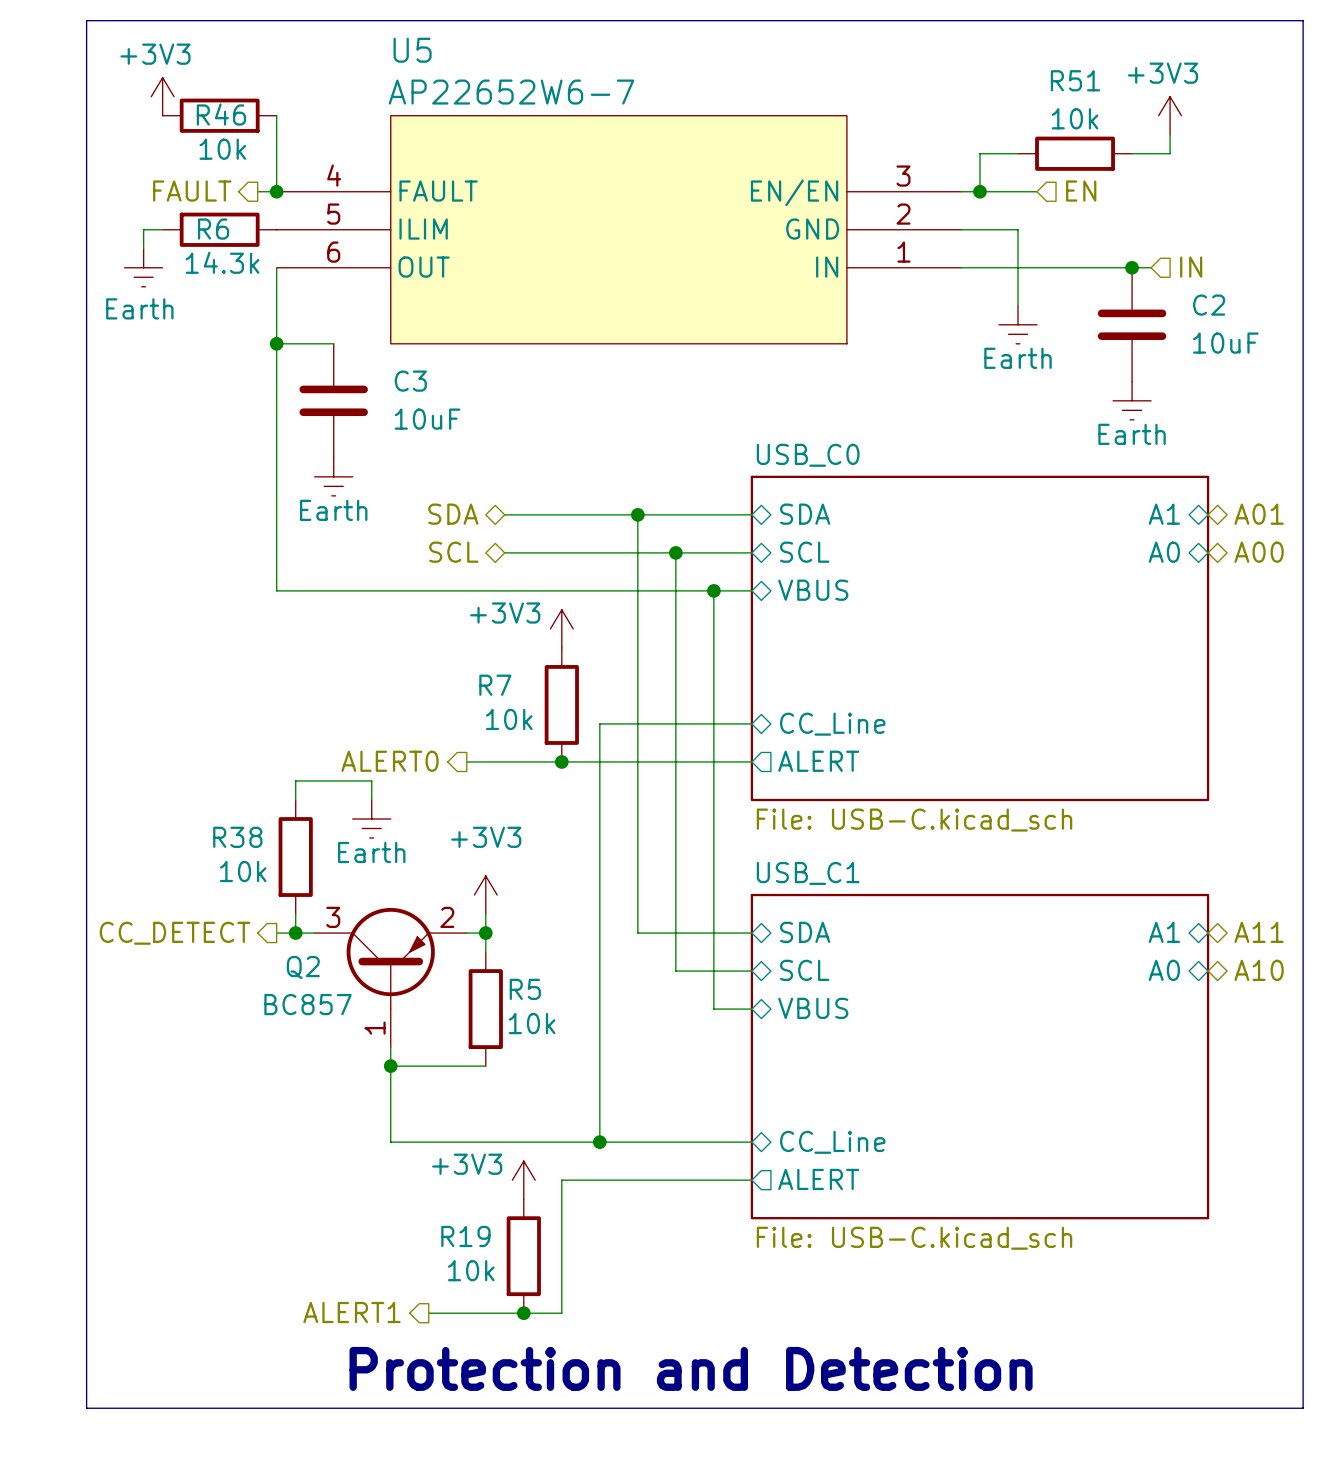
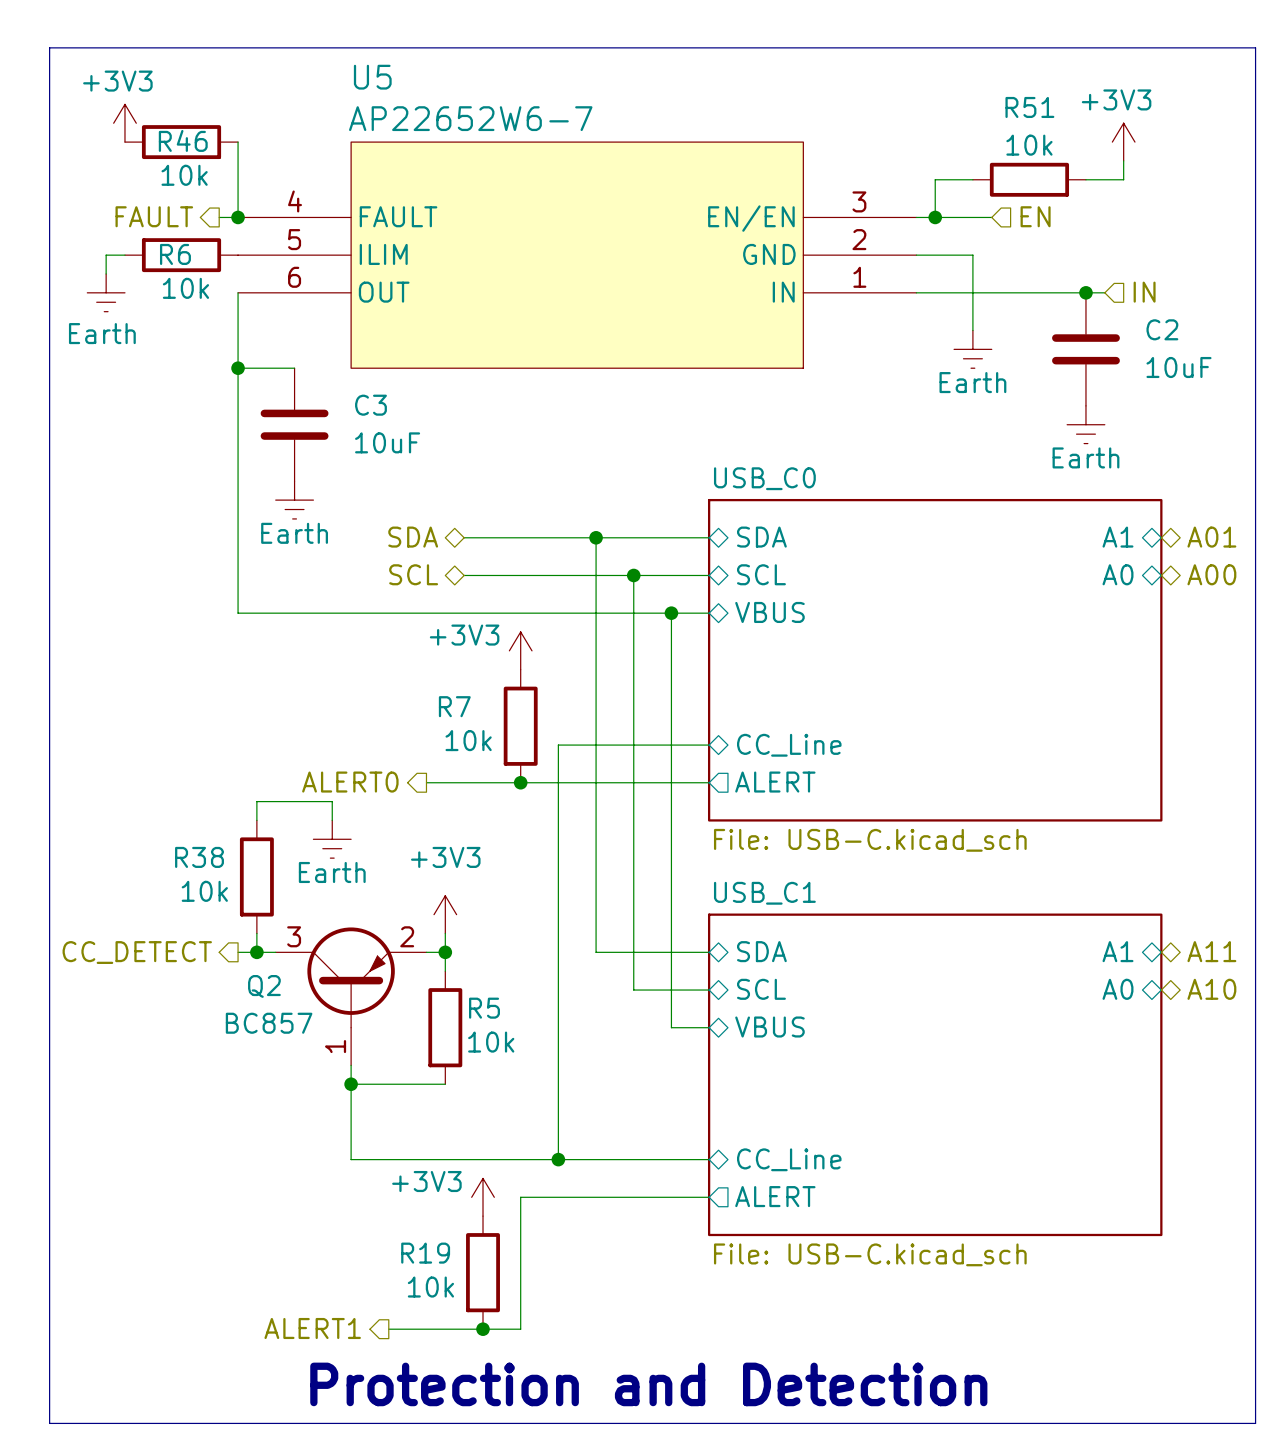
R6 value: 14.3k (222, 262) -> 10k (185, 288)

